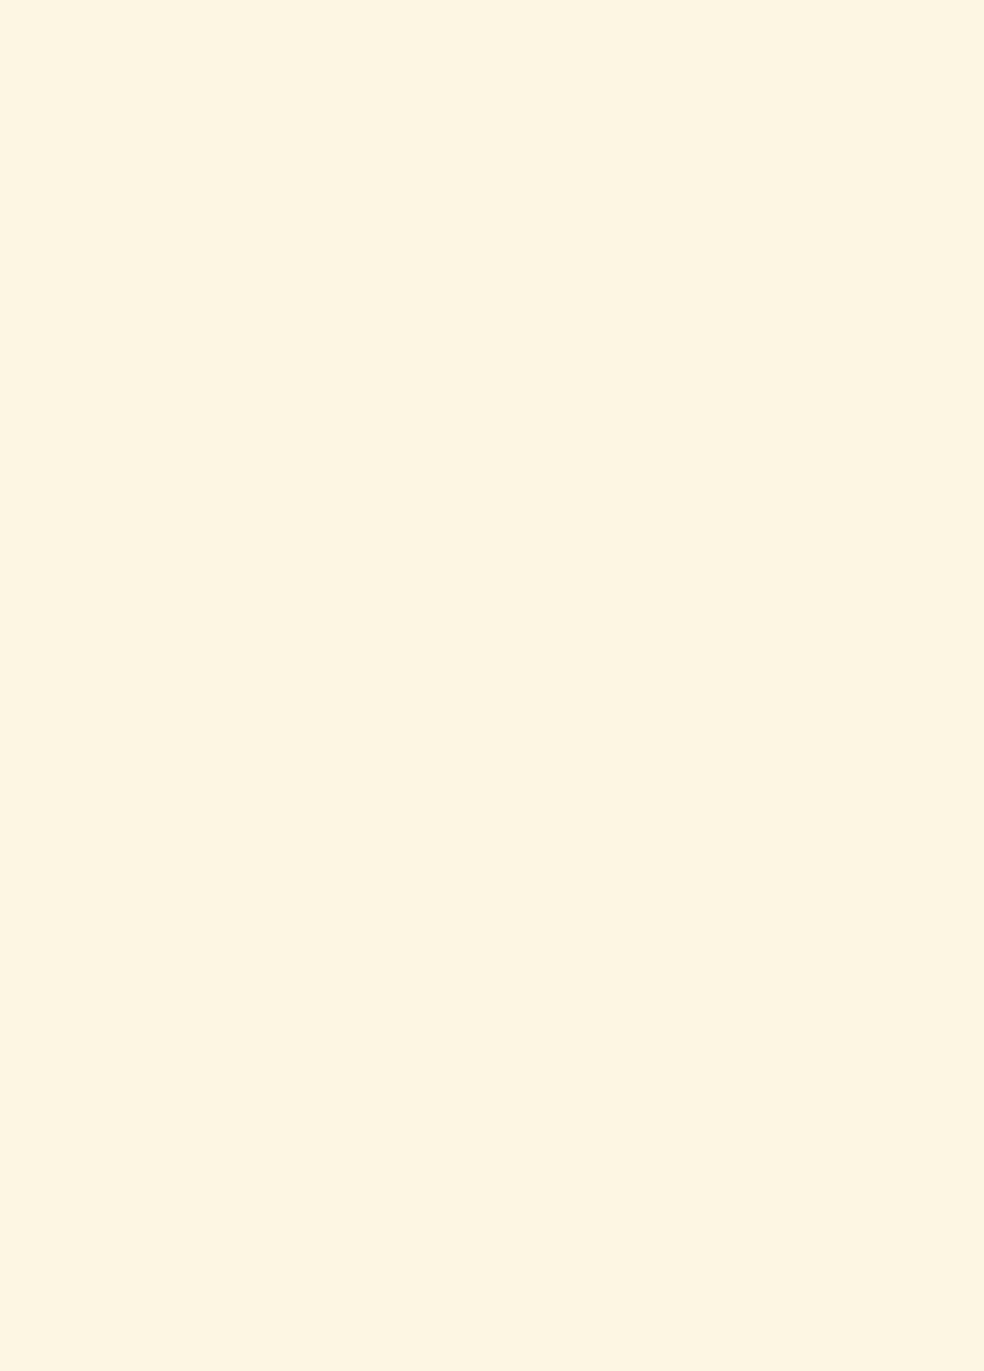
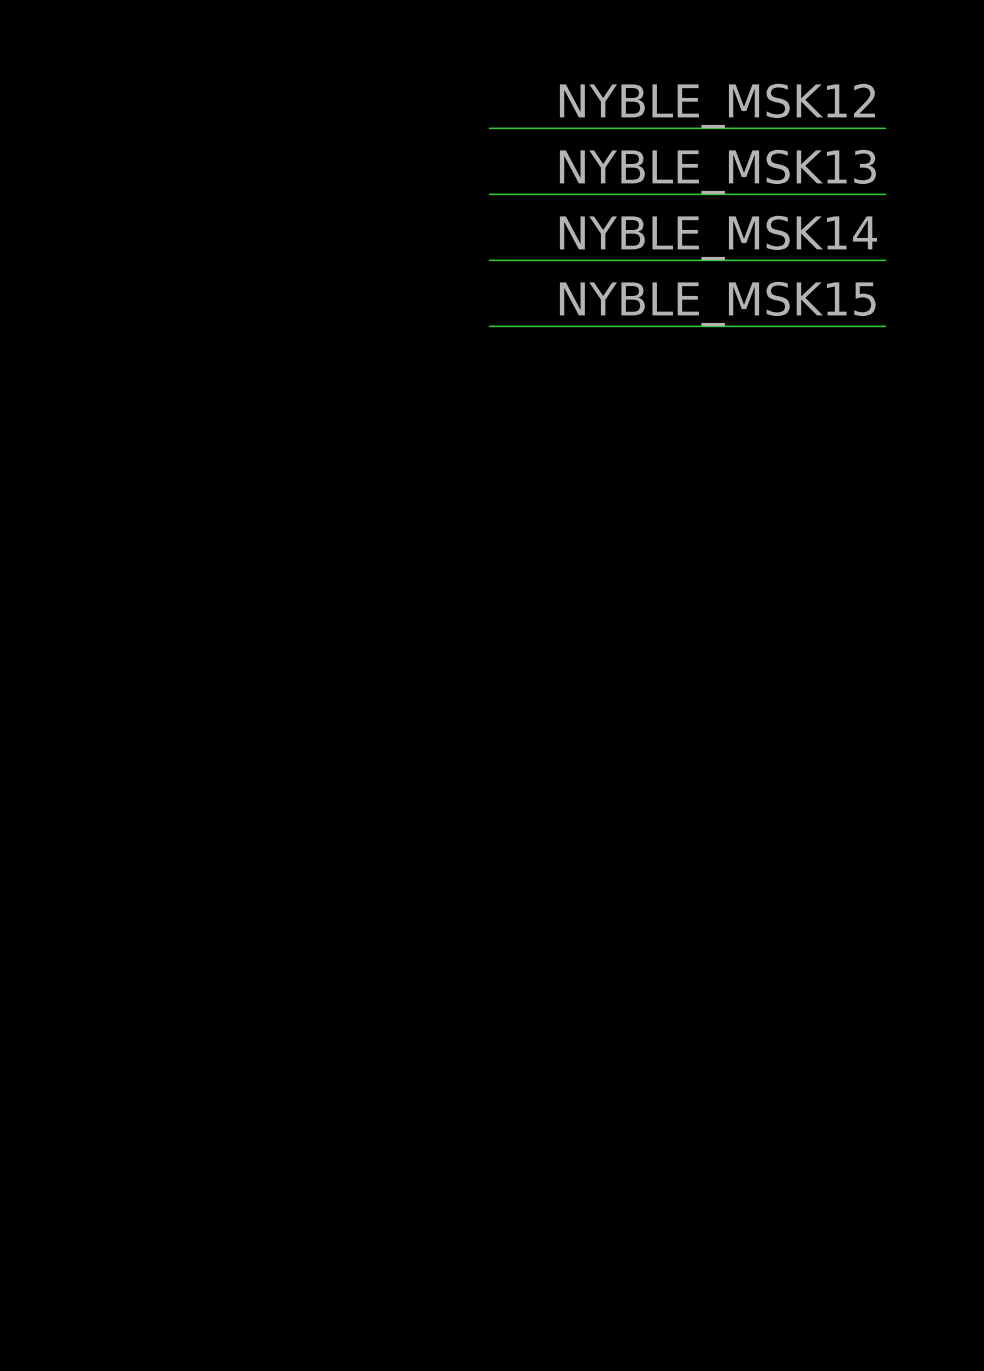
label: none -> NYBLE_MSK12 (717, 105)
wire: none -> (489, 128) (885, 128)
label: none -> NYBLE_MSK13 (717, 171)
wire: none -> (489, 194) (885, 194)
label: none -> NYBLE_MSK14 (718, 237)
wire: none -> (489, 260) (885, 260)
label: none -> NYBLE_MSK15 (717, 303)
wire: none -> (489, 326) (885, 326)

